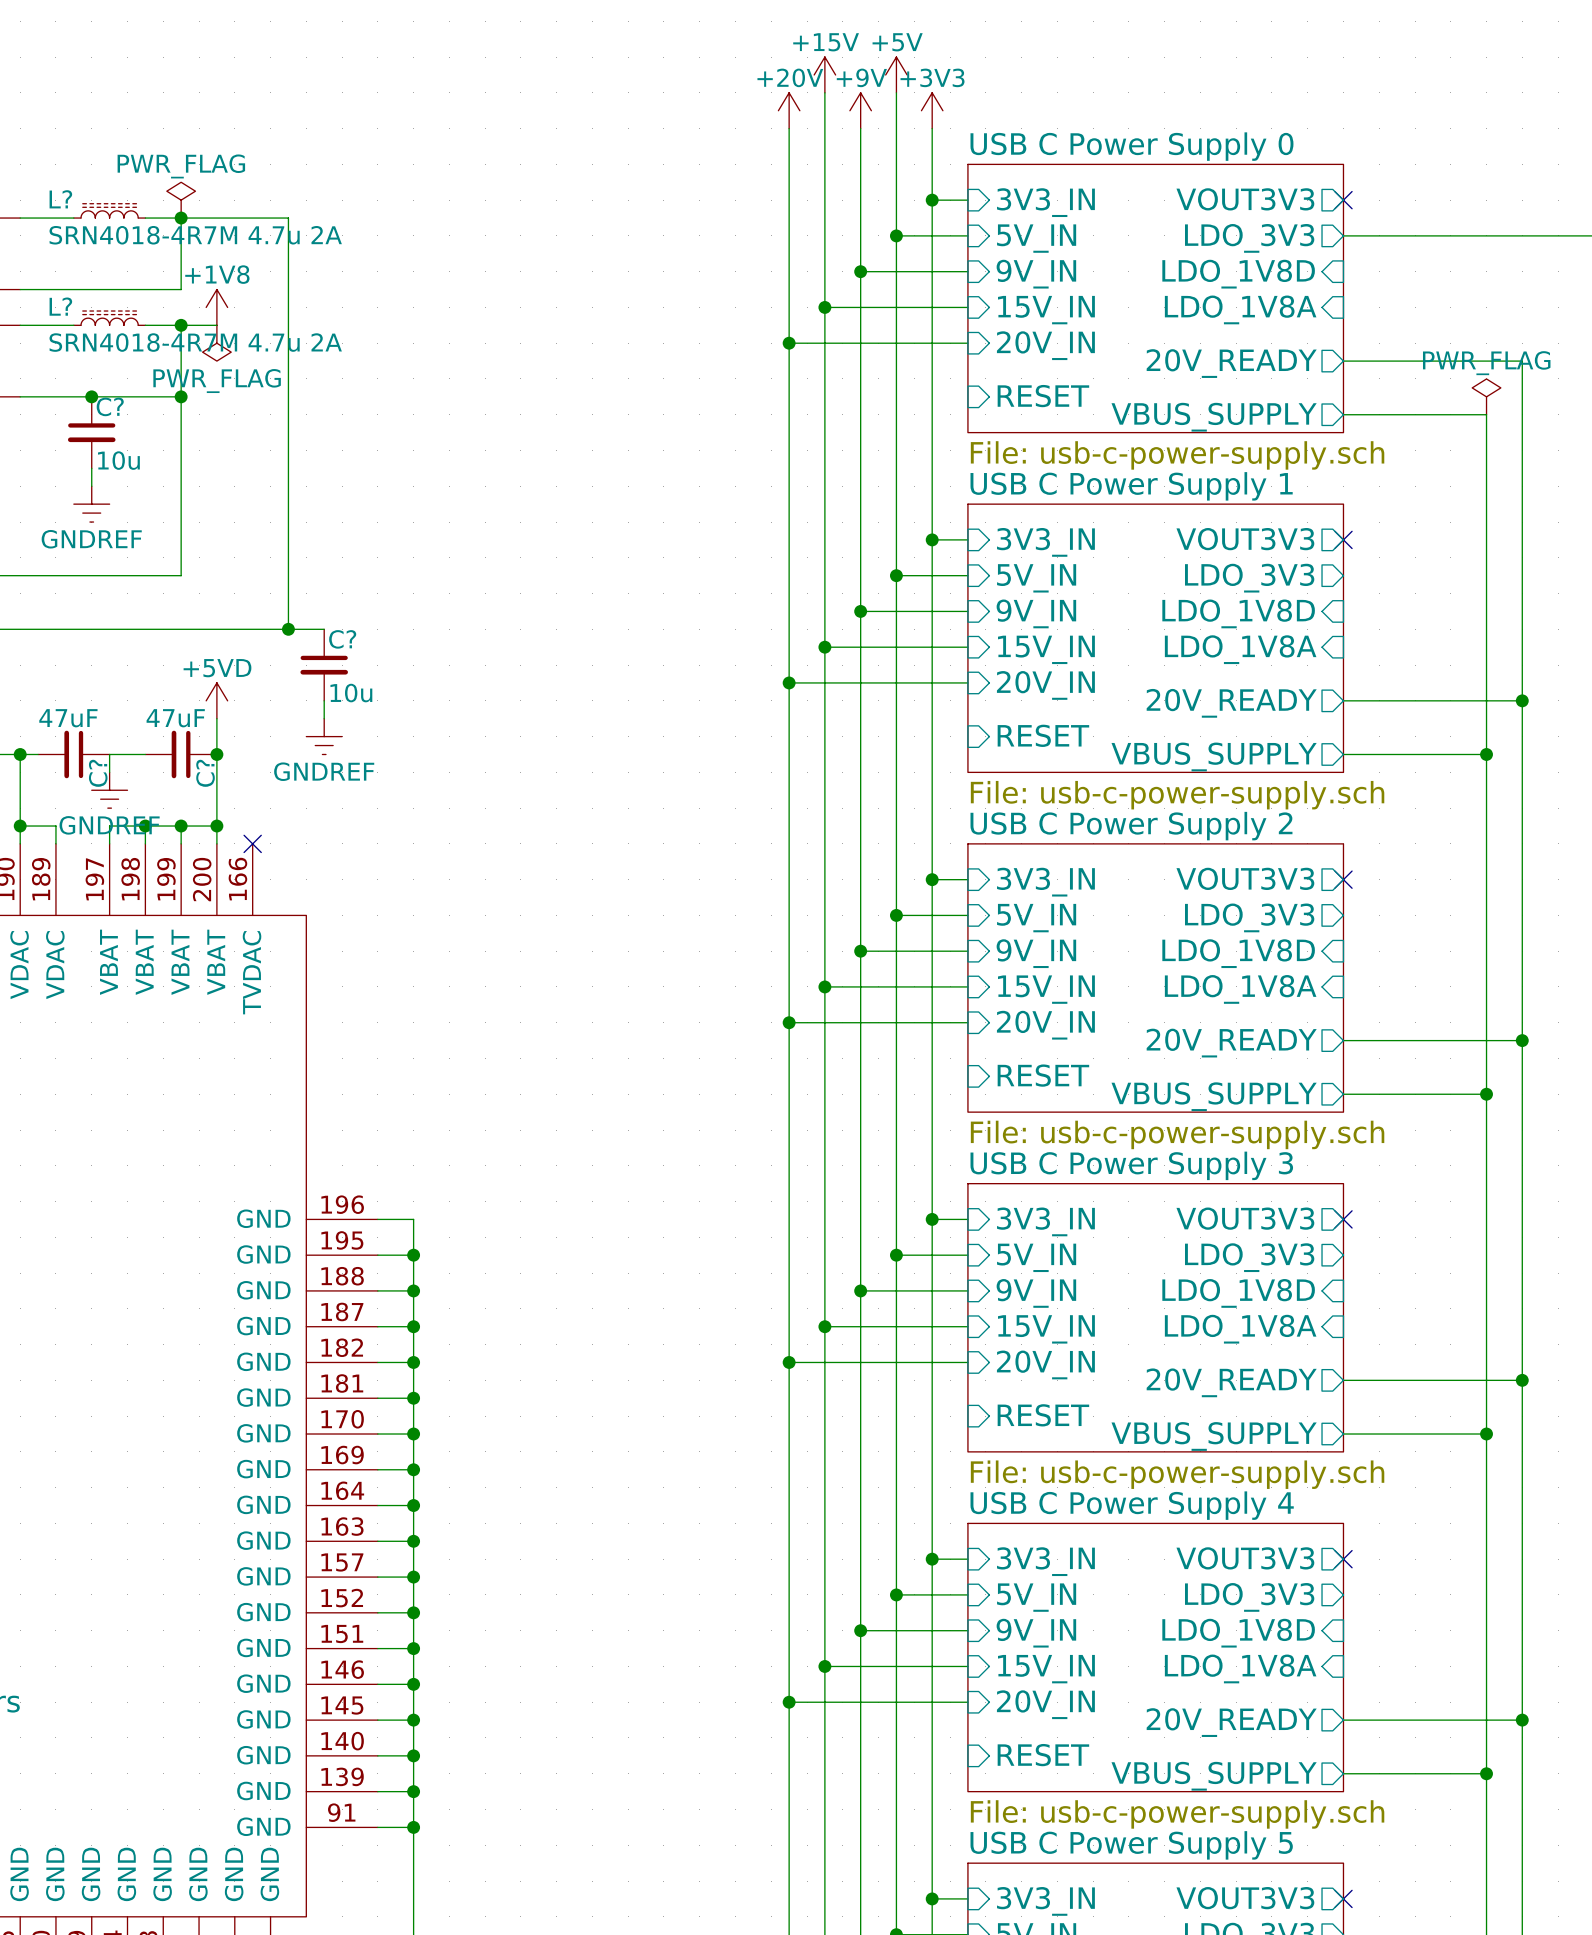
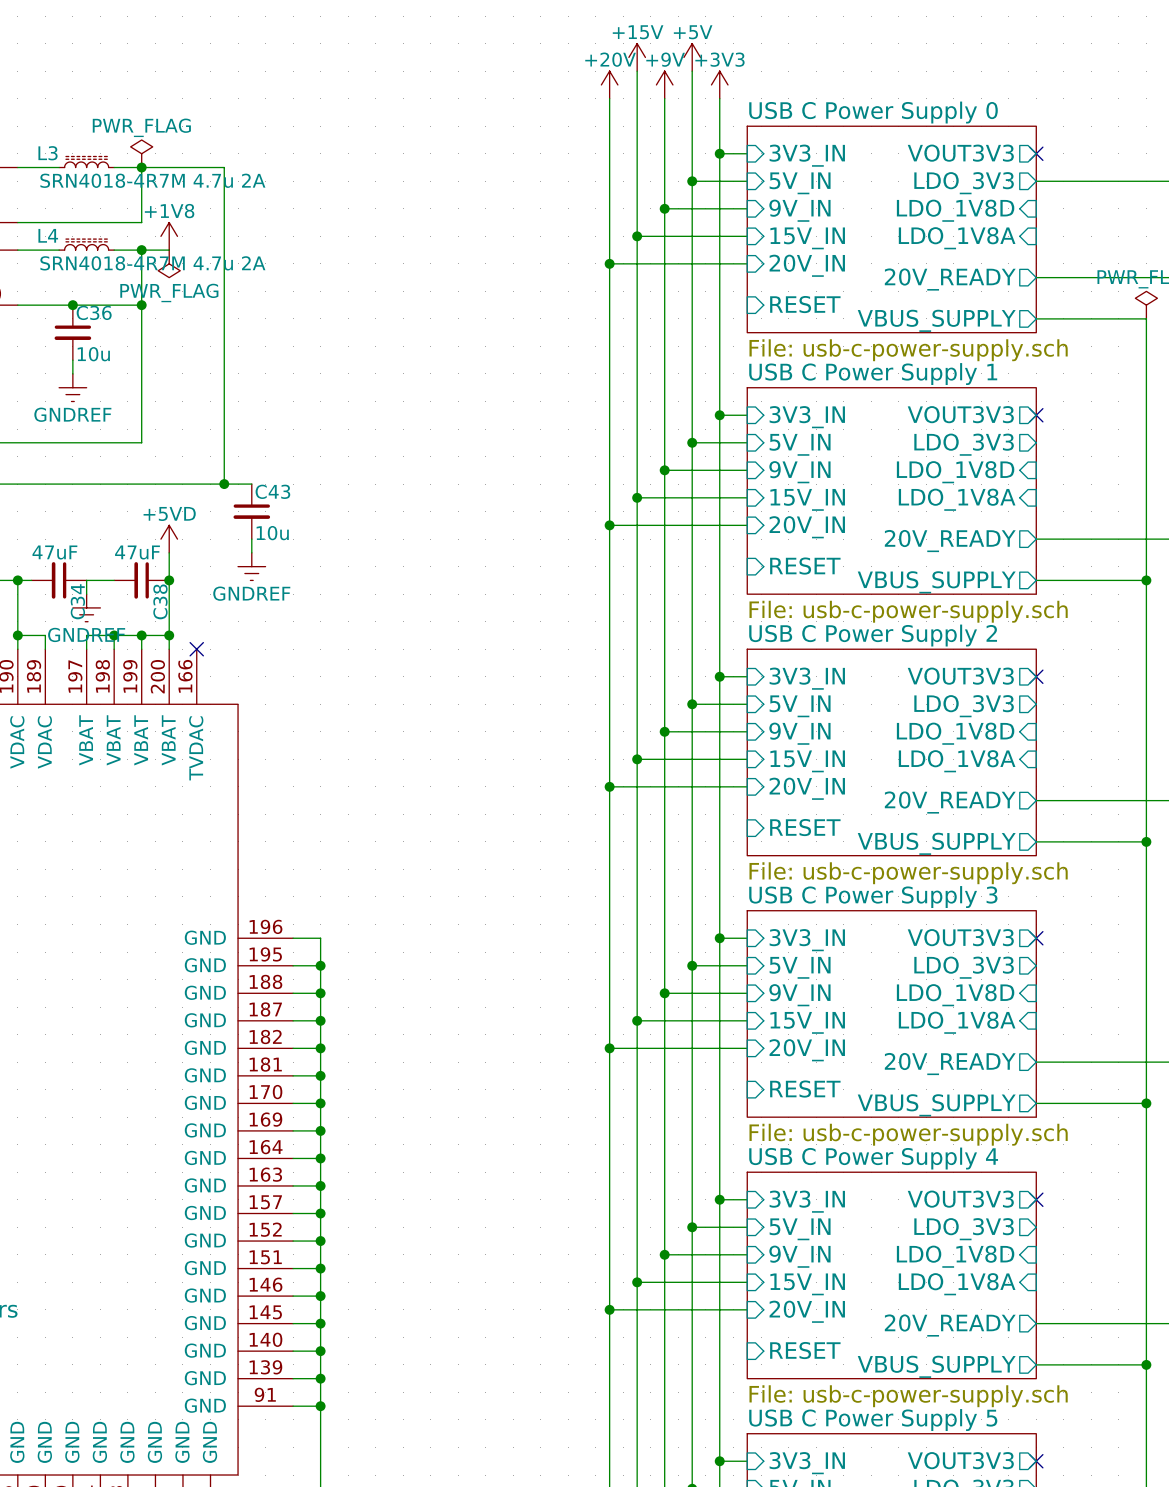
L? name: L? (60, 199) -> L3 (48, 153)
L? name: L? (60, 306) -> L4 (48, 235)
C? name: C? (110, 406) -> C36 (94, 312)
C? name: C? (342, 639) -> C43 (272, 491)
C? name: C? (98, 773) -> C34 (77, 601)
C? name: C? (205, 773) -> C38 (160, 601)

